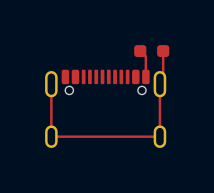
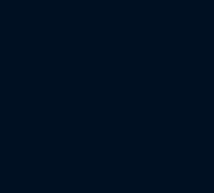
top track: (140, 51) (145, 56) (145, 76) -> none
part: (151, 51) -> none
top track: (163, 51) (163, 80) (159, 84) (159, 136) (51, 136) (51, 84) -> none
part: (105, 108) -> none

